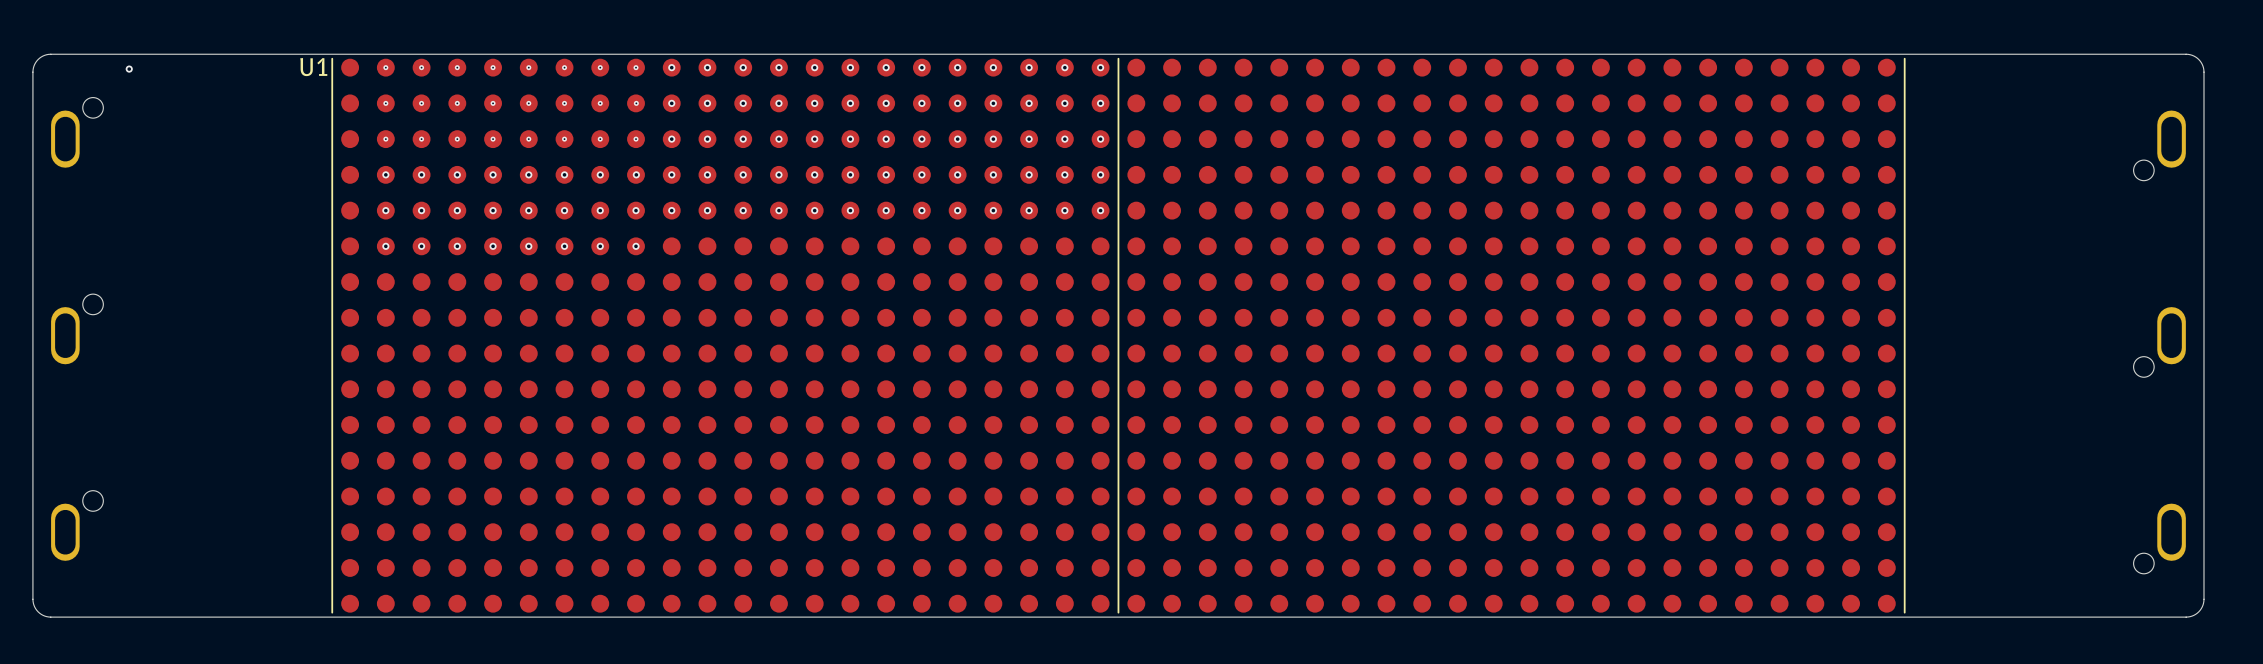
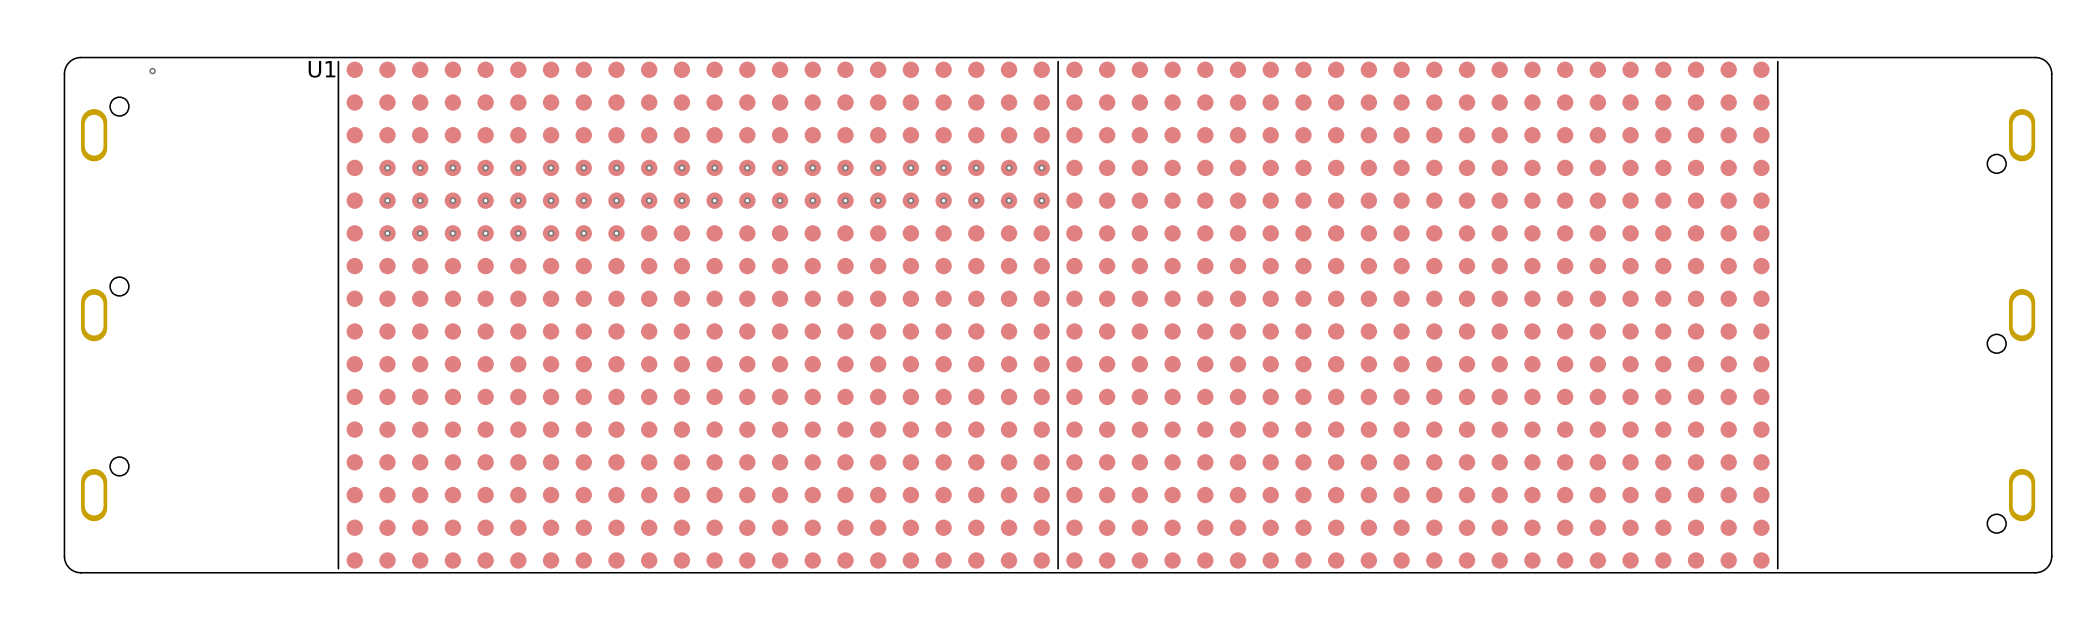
via: (385, 67) -> none
via: (421, 67) -> none
via: (457, 67) -> none
via: (493, 67) -> none
via: (528, 67) -> none
via: (564, 67) -> none
via: (600, 67) -> none
via: (636, 67) -> none
via: (671, 67) -> none
via: (707, 67) -> none
via: (743, 67) -> none
via: (778, 67) -> none
via: (814, 67) -> none
via: (850, 67) -> none
via: (886, 67) -> none
via: (921, 67) -> none
via: (957, 67) -> none
via: (993, 67) -> none
via: (1029, 67) -> none
via: (1064, 67) -> none
via: (1100, 67) -> none
via: (385, 103) -> none
via: (421, 103) -> none
via: (457, 103) -> none
via: (493, 103) -> none
via: (528, 103) -> none
via: (564, 103) -> none
via: (600, 103) -> none
via: (636, 103) -> none
via: (671, 103) -> none
via: (707, 103) -> none
via: (743, 103) -> none
via: (778, 103) -> none
via: (814, 103) -> none
via: (850, 103) -> none
via: (886, 103) -> none
via: (921, 103) -> none
via: (957, 103) -> none
via: (993, 103) -> none
via: (1029, 103) -> none
via: (1064, 103) -> none
via: (1100, 103) -> none
via: (385, 139) -> none
via: (421, 139) -> none
via: (457, 139) -> none
via: (493, 139) -> none
via: (528, 139) -> none
via: (564, 139) -> none
via: (600, 139) -> none
via: (636, 139) -> none
via: (671, 139) -> none
via: (707, 139) -> none
via: (743, 139) -> none
via: (778, 139) -> none
via: (814, 139) -> none
via: (850, 139) -> none
via: (886, 139) -> none
via: (921, 139) -> none
via: (957, 139) -> none
via: (993, 139) -> none
via: (1029, 139) -> none
via: (1064, 139) -> none
via: (1100, 139) -> none

